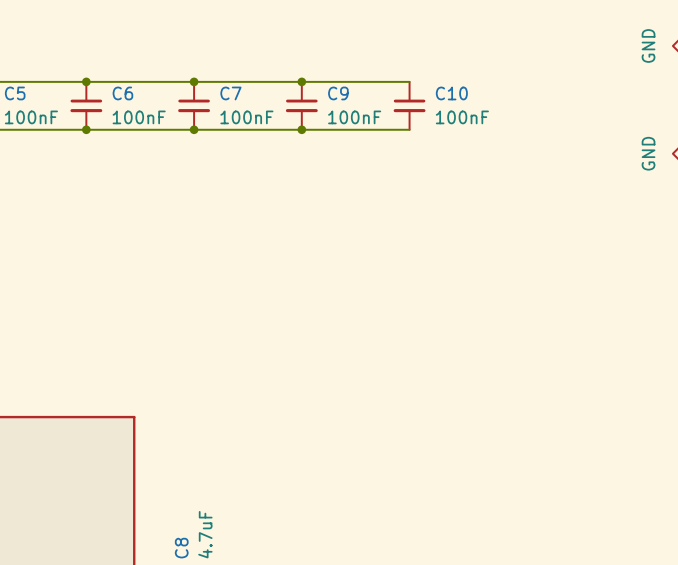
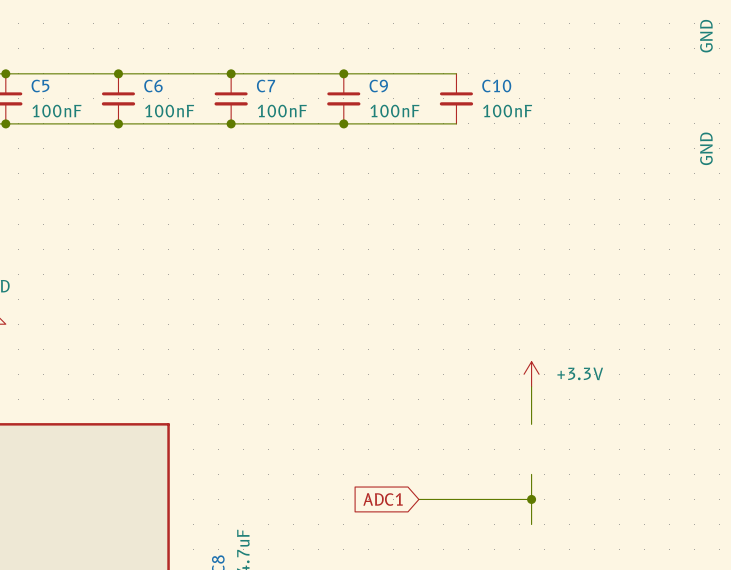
power symbol: none -> +3.3V (531, 374)
wire: none -> (531, 386) (531, 424)
wire: none -> (531, 474) (531, 524)
global label: none -> ADC1 (383, 499)
wire: none -> (418, 499) (531, 499)
junction: none -> (531, 499)

